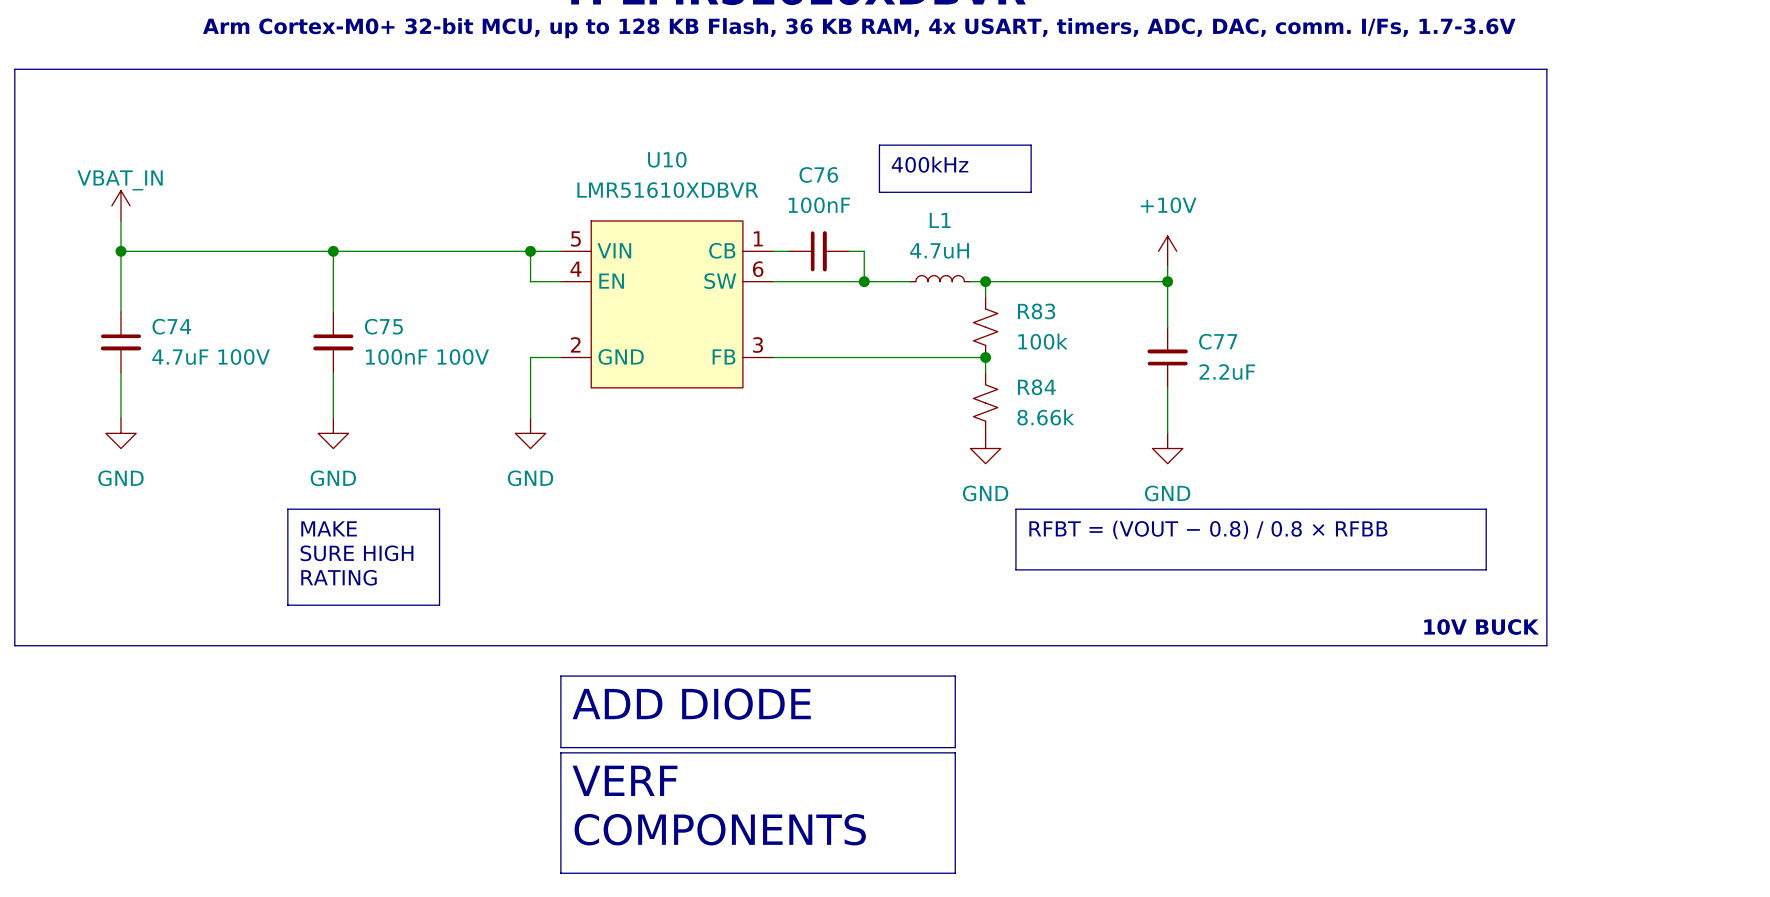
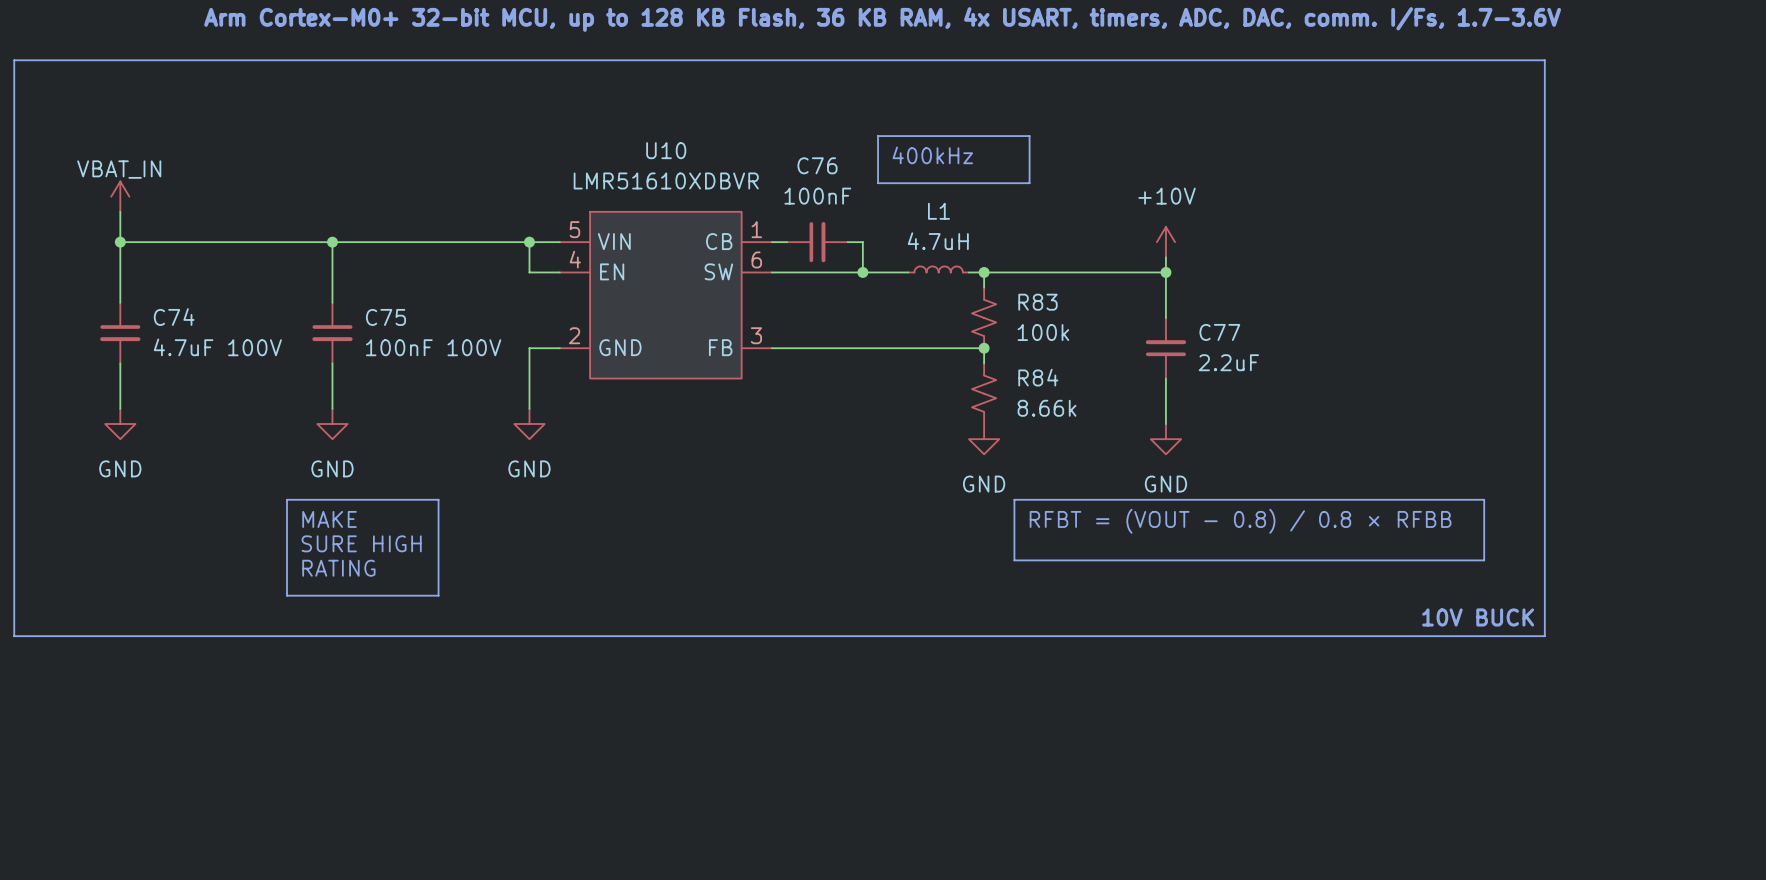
line: (560, 676) (560, 747) (955, 747) (955, 676) (560, 676) -> none
text: ADD DIODE (691, 704) -> none
line: (560, 752) (955, 752) (955, 873) (560, 873) (560, 752) -> none
text: VERF (625, 780) -> none
text: COMPONENTS (720, 829) -> none

